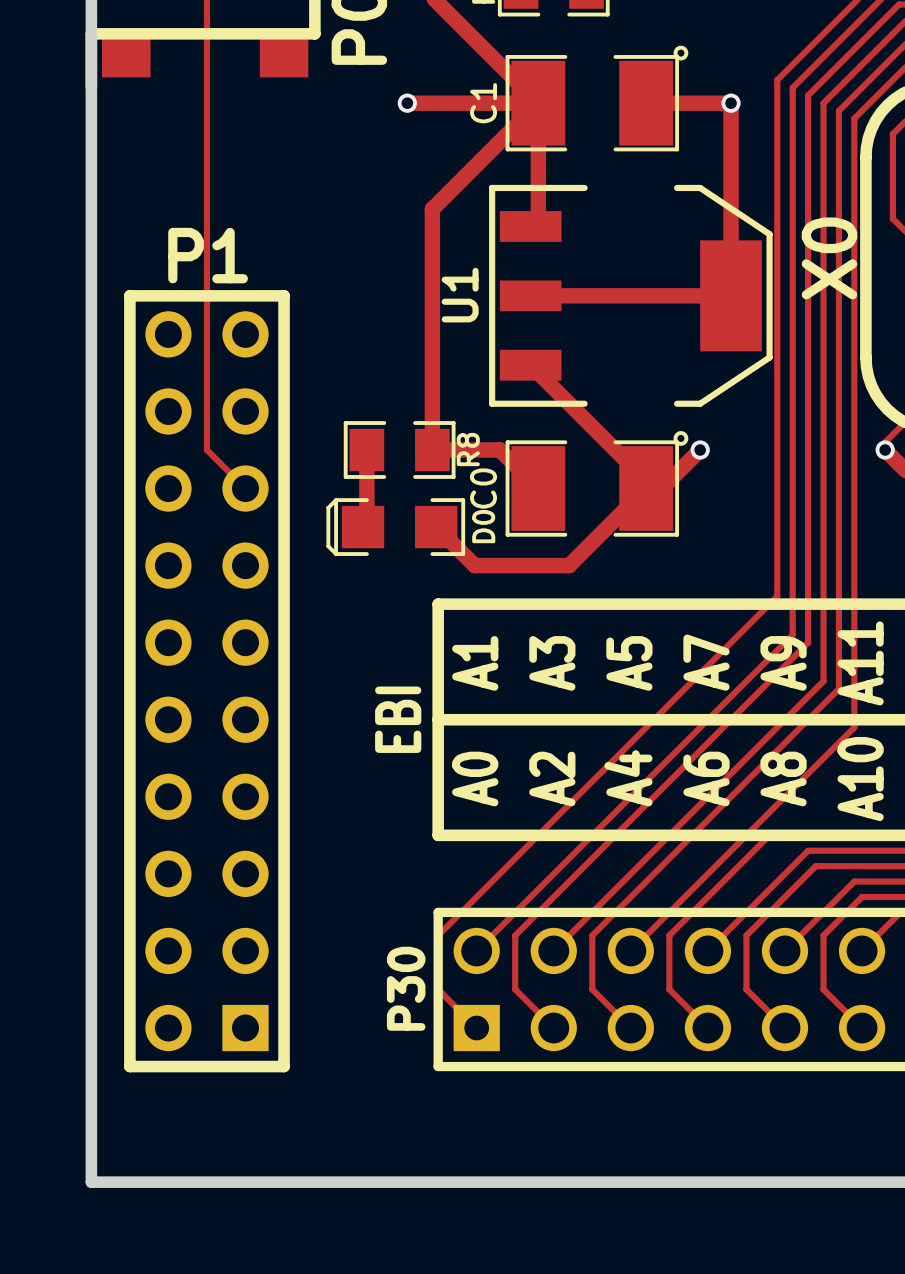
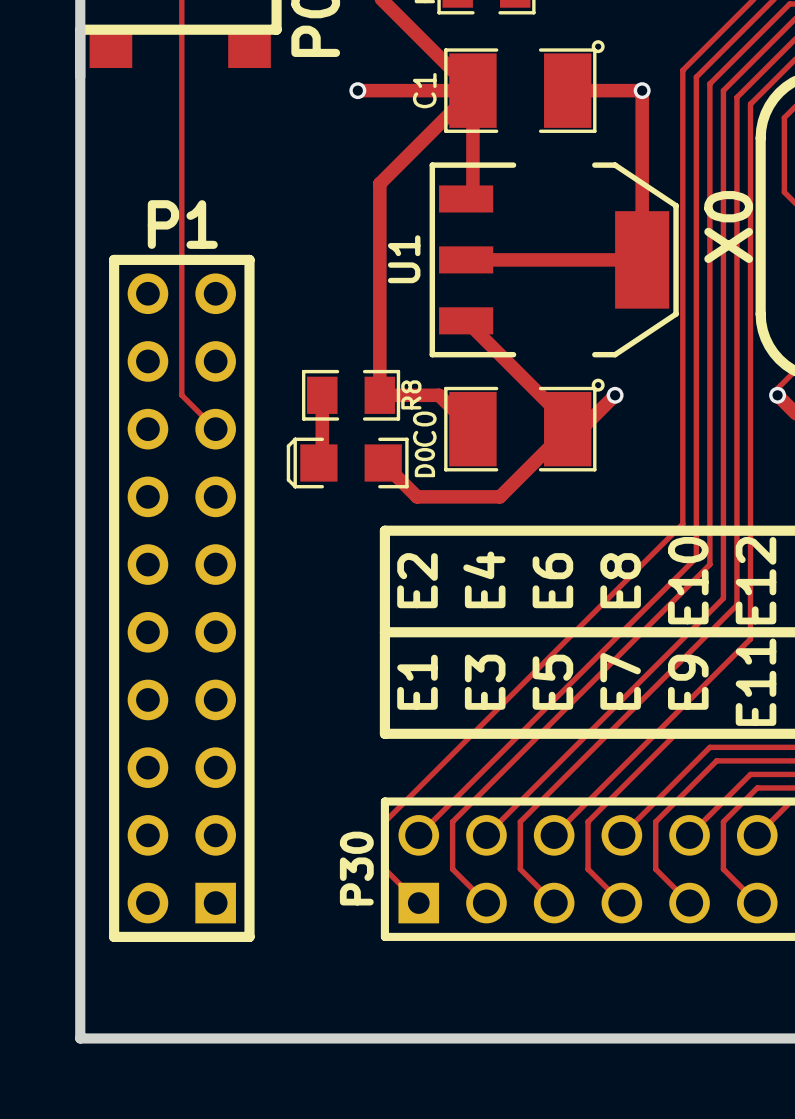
text: A7 (706, 662) -> E8 (620, 580)
text: A1 (475, 663) -> E2 (417, 580)
text: A3 (552, 663) -> E4 (484, 579)
text: A5 (629, 663) -> E6 (552, 580)
text: A9 (783, 663) -> E10 (688, 580)
text: A11 (860, 663) -> E12 (756, 580)
text: EBI (398, 719) -> none
text: A4 (628, 778) -> E5 (552, 682)
text: A0 (475, 779) -> E1 (417, 682)
text: A2 (552, 779) -> E3 (485, 682)
text: A6 (706, 779) -> E7 (620, 681)
text: A8 (783, 779) -> E9 (688, 682)
text: A10 (860, 779) -> E11 (756, 682)

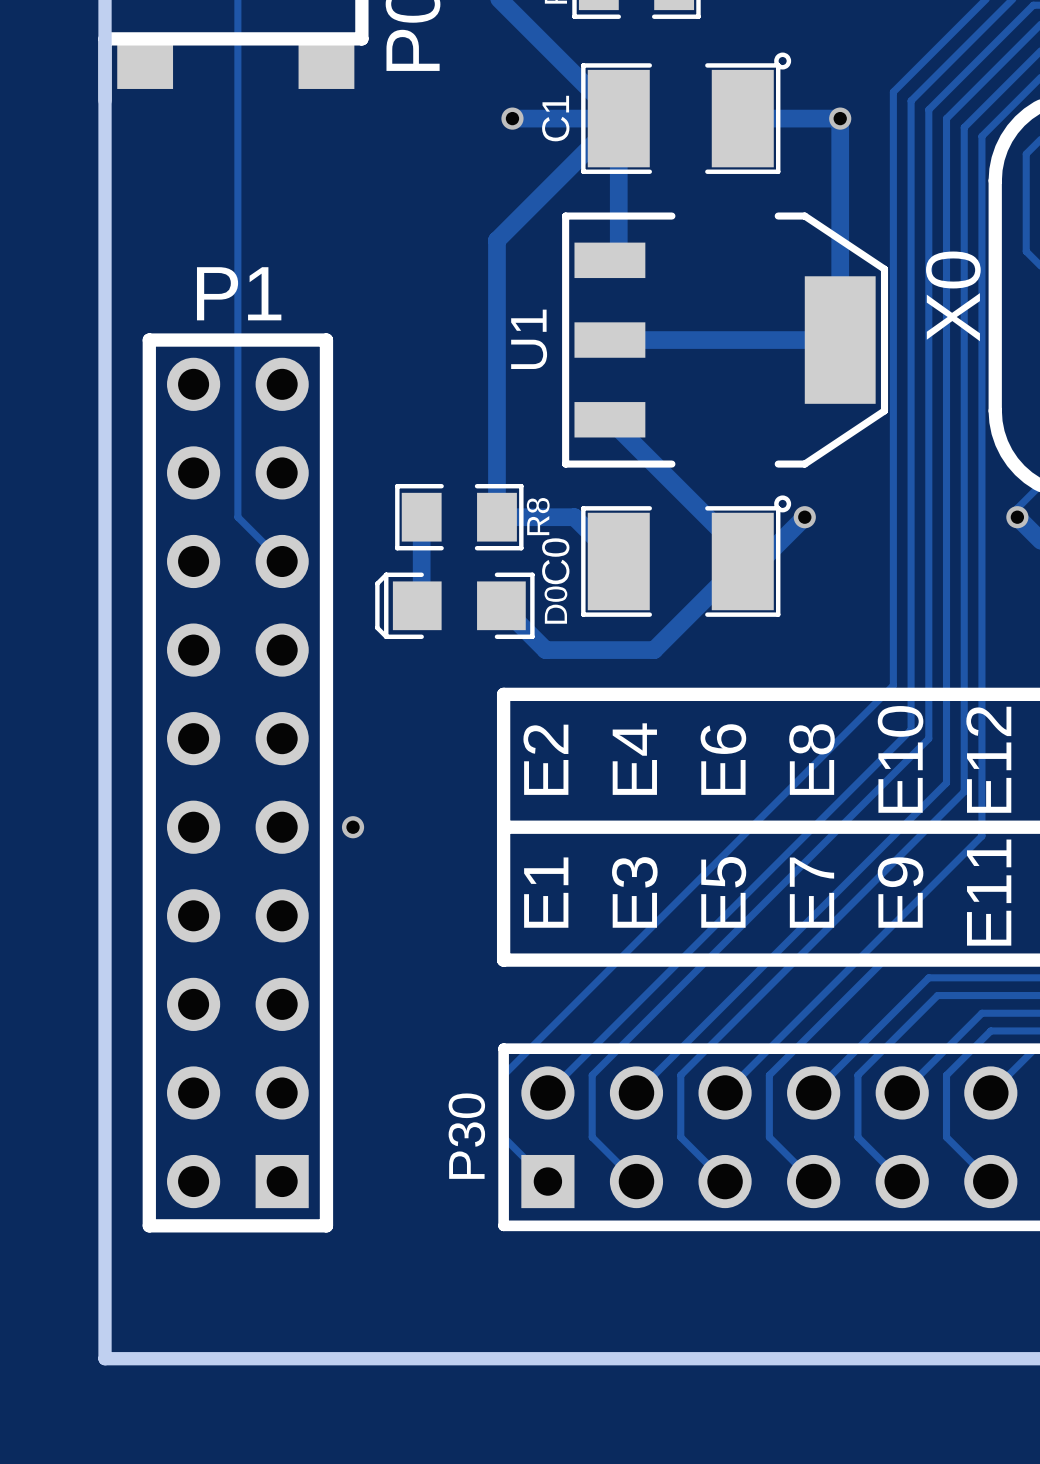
track: (357, 90) (391, 90) -> none
via position: (357, 90) -> (512, 118)
via: none -> (353, 827)

